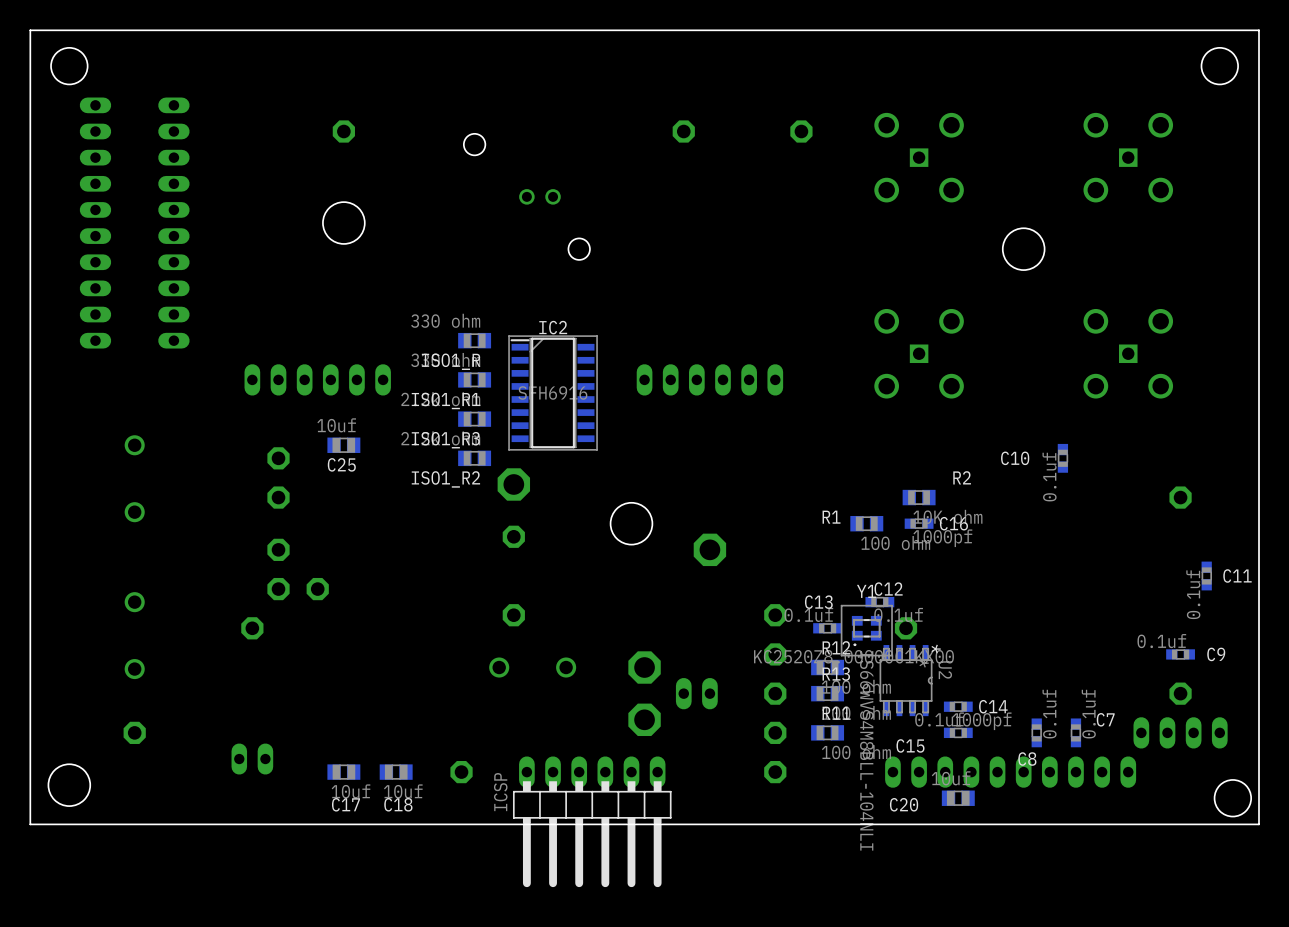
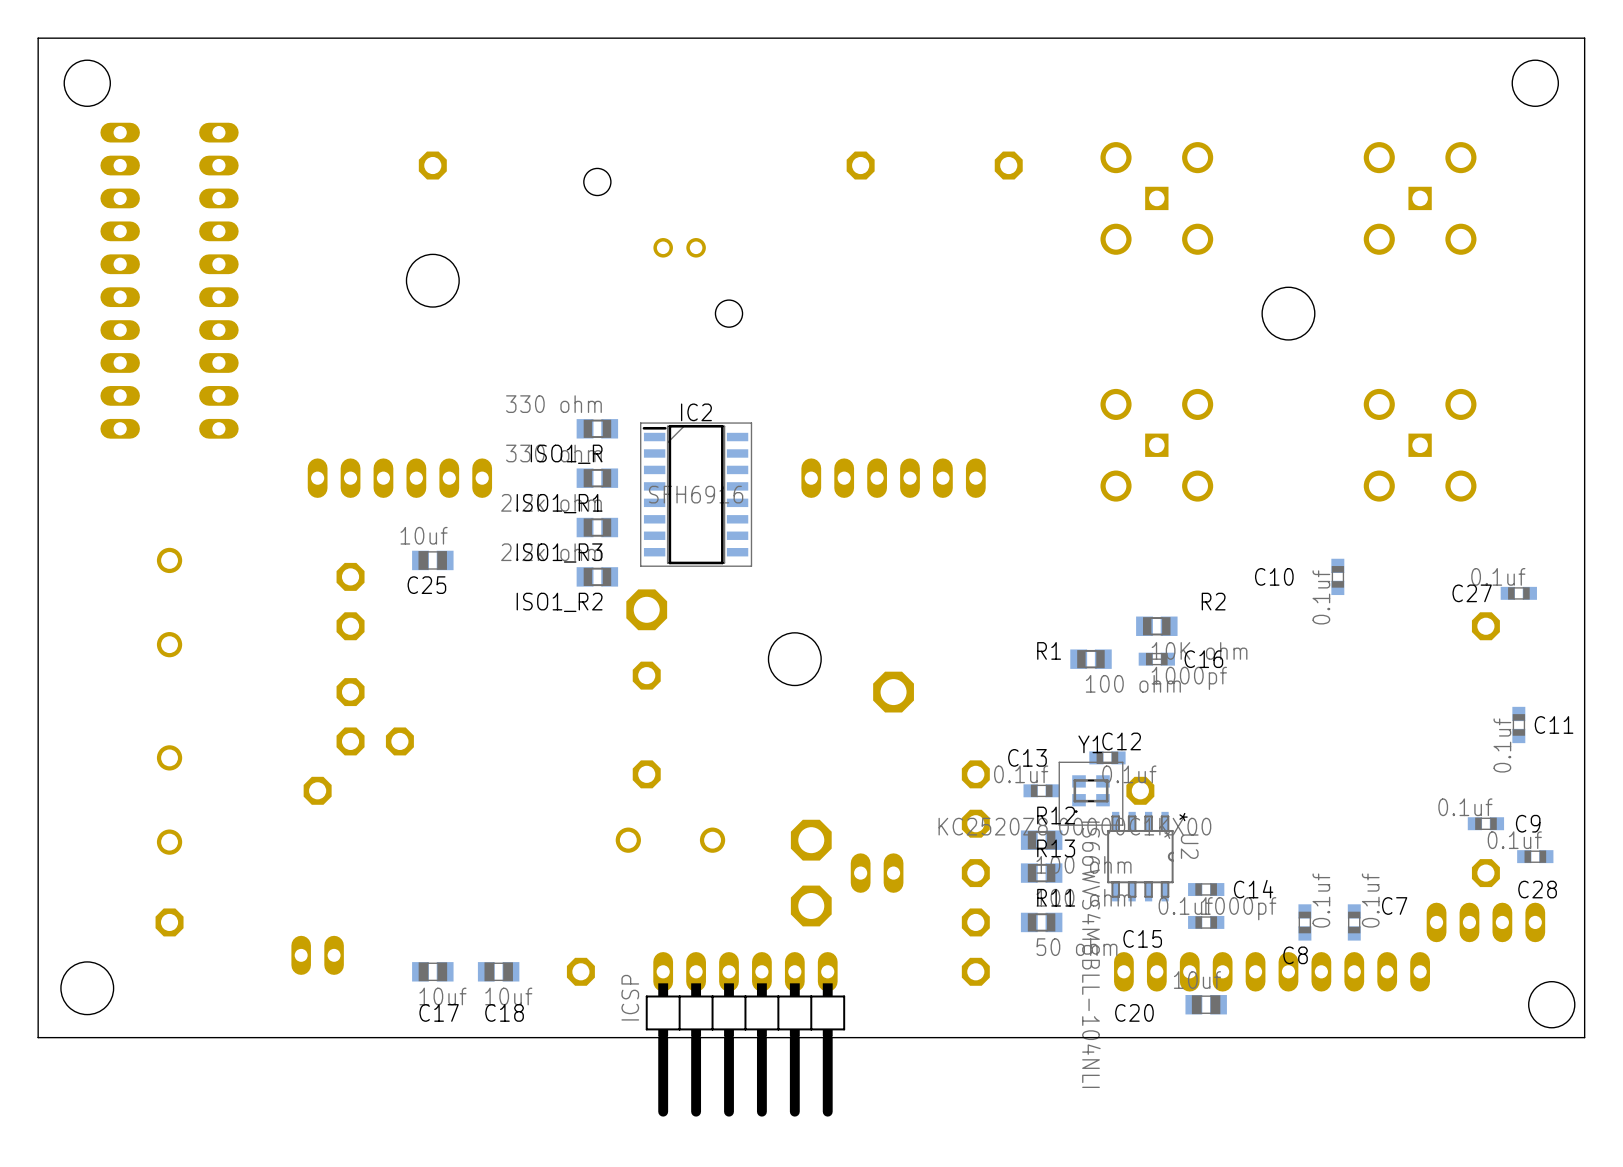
C27: none -> 0.1uf (1518, 593)
C28: none -> 0.1uf (1535, 856)
R11 value: 100 ohm (856, 752) -> 50 ohm (1076, 947)

